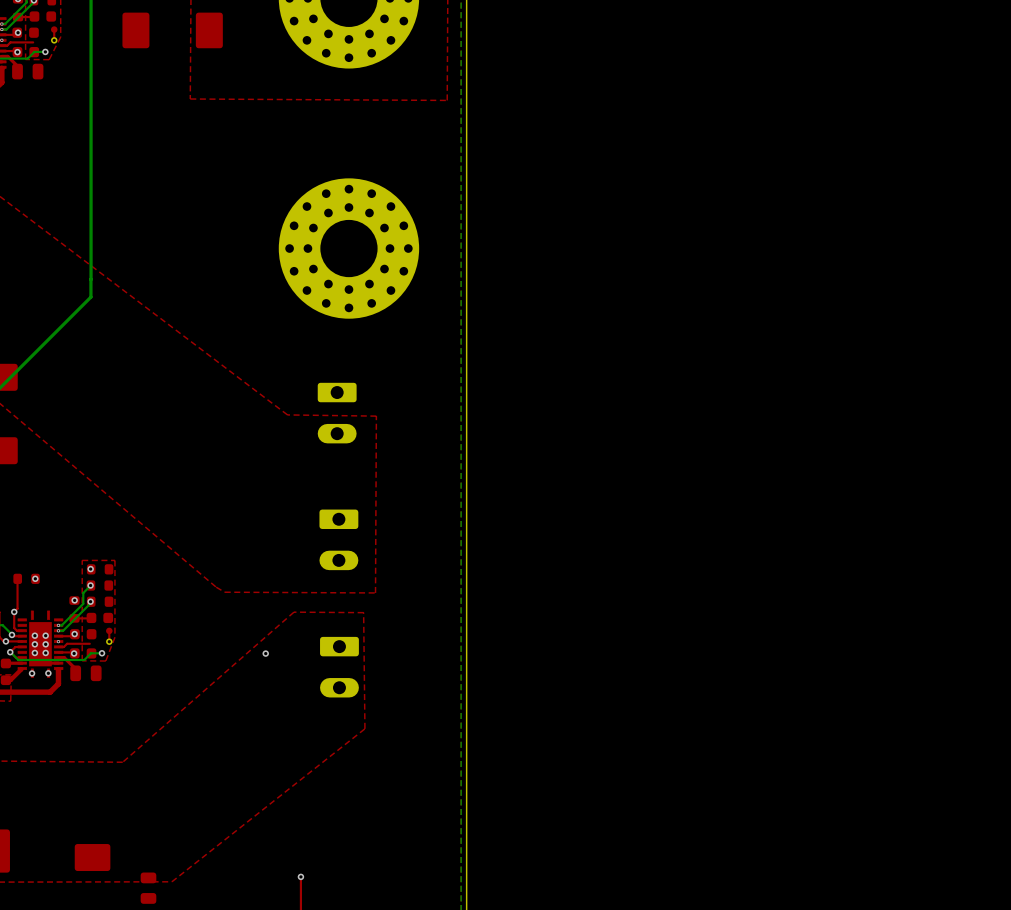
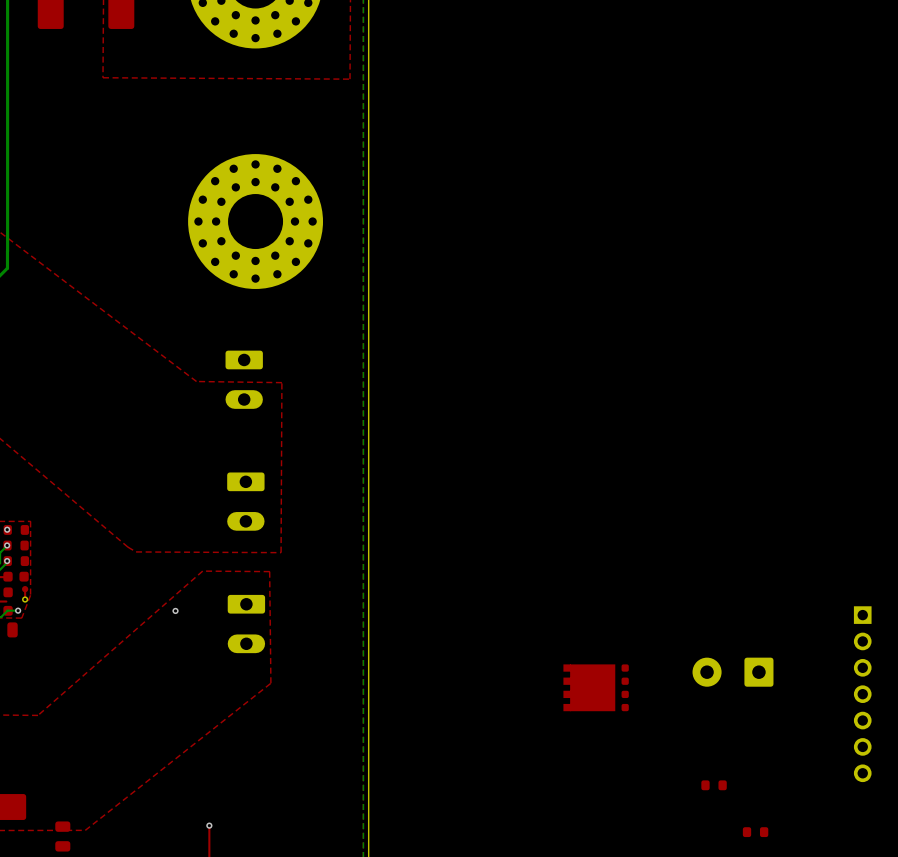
part: none -> (732, 672)
part: none -> (596, 687)
part: none -> (862, 694)
part: none -> (714, 785)
part: none -> (755, 832)

